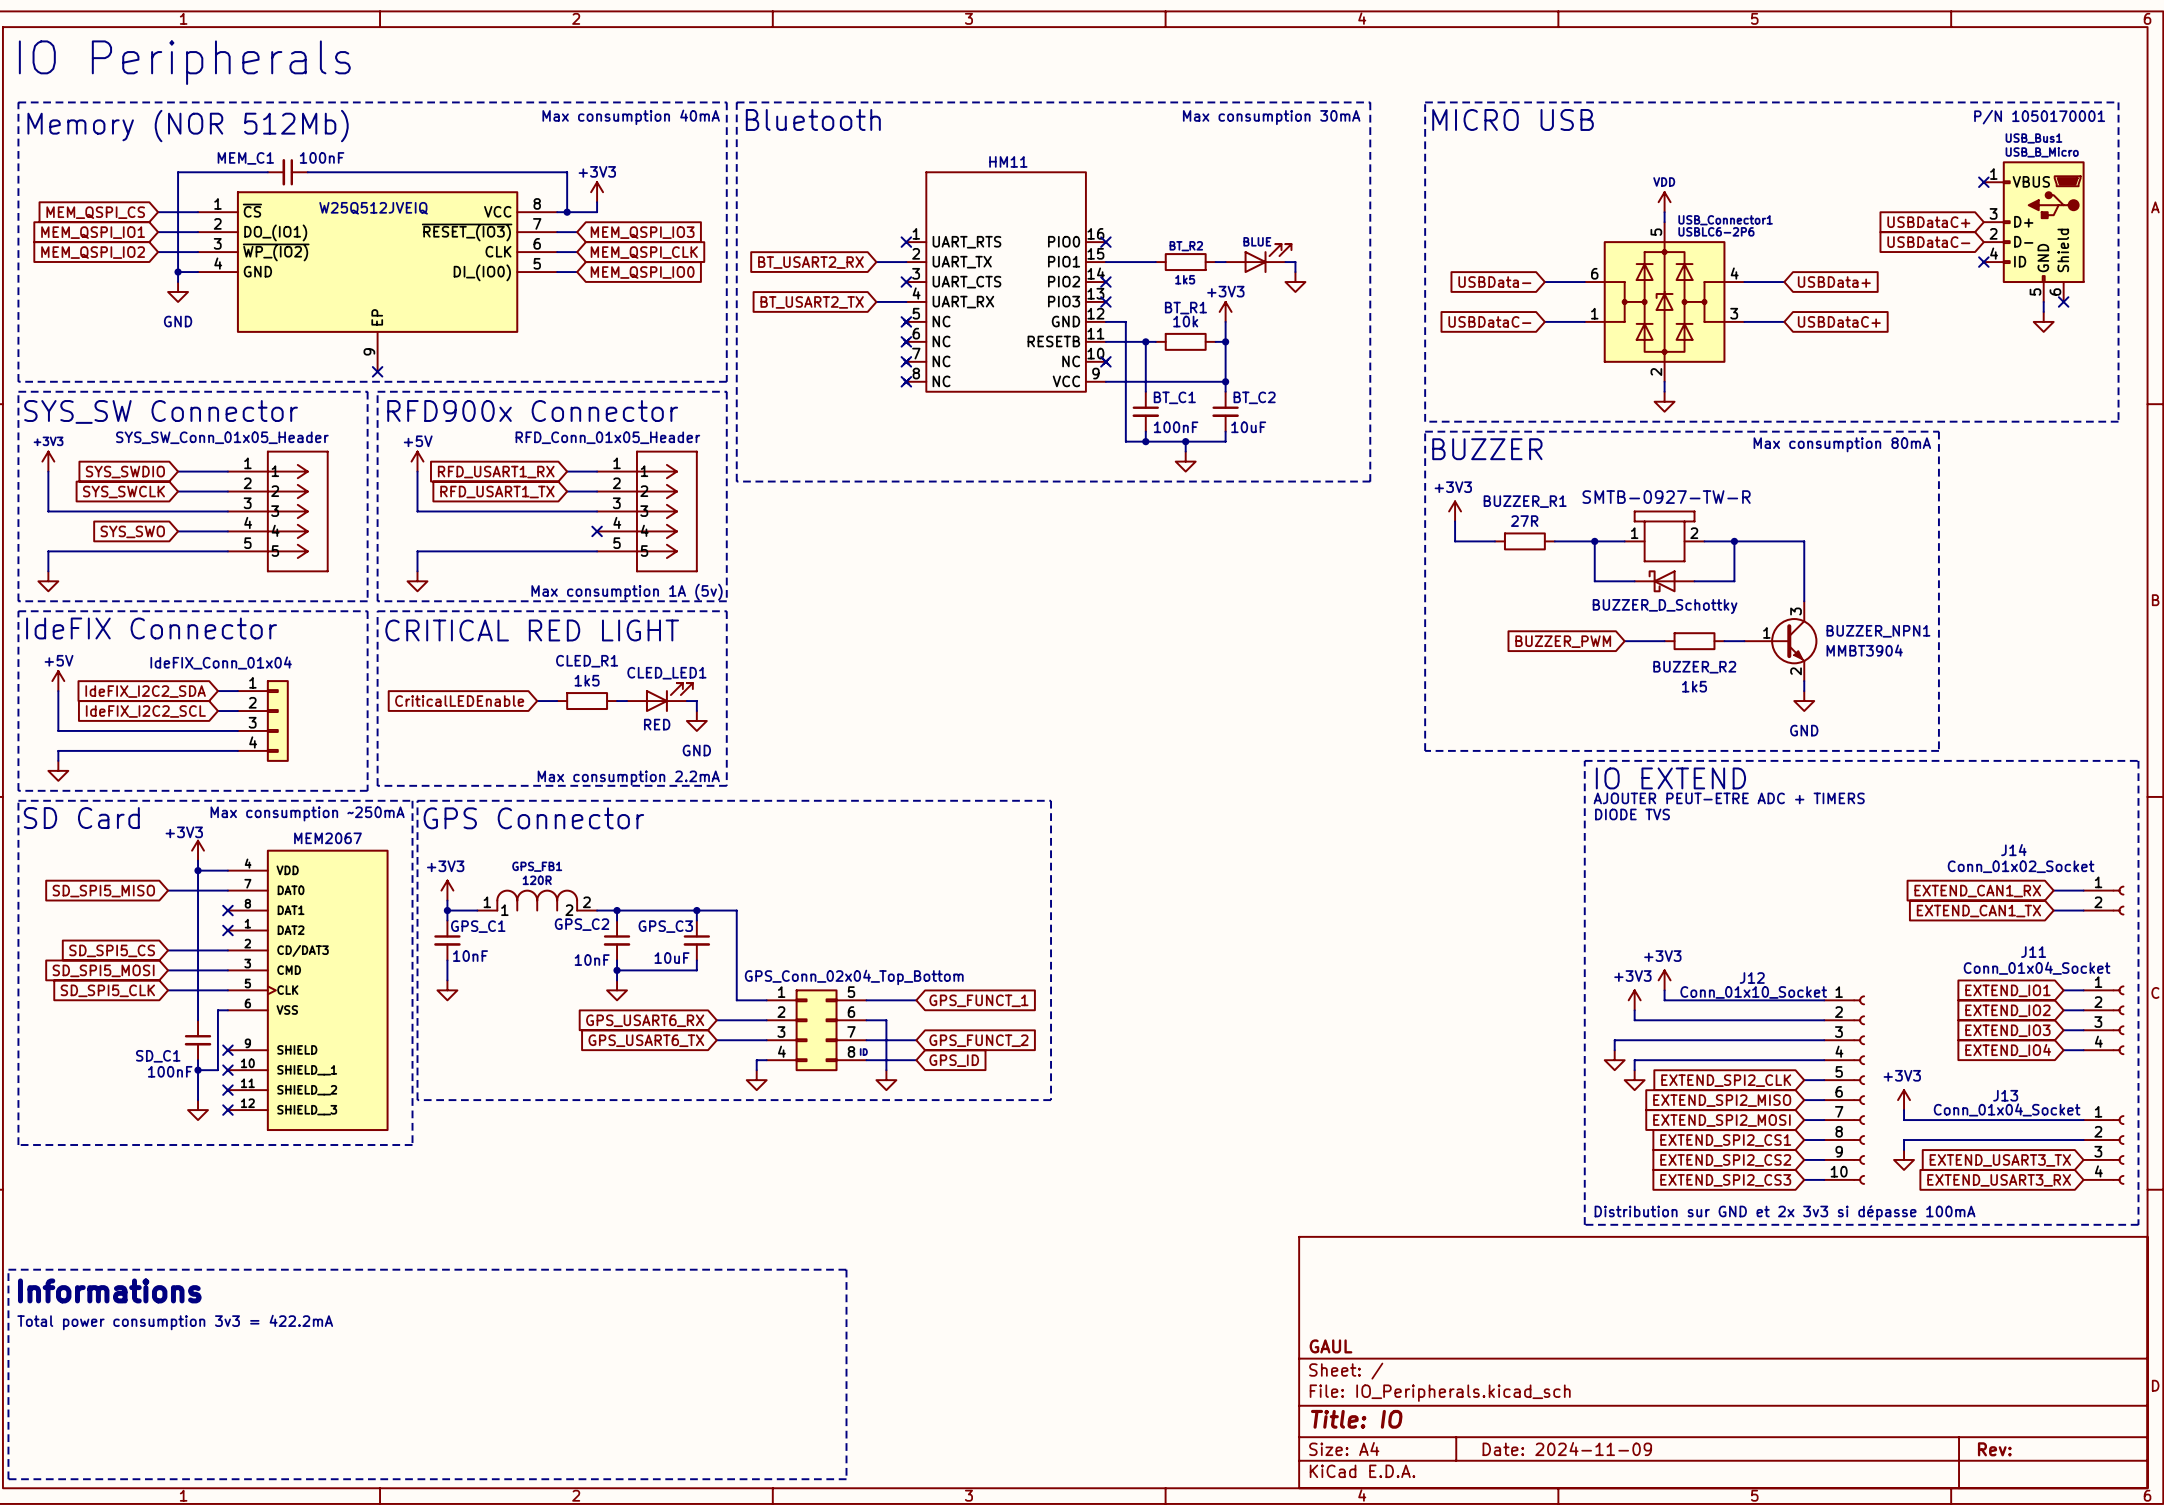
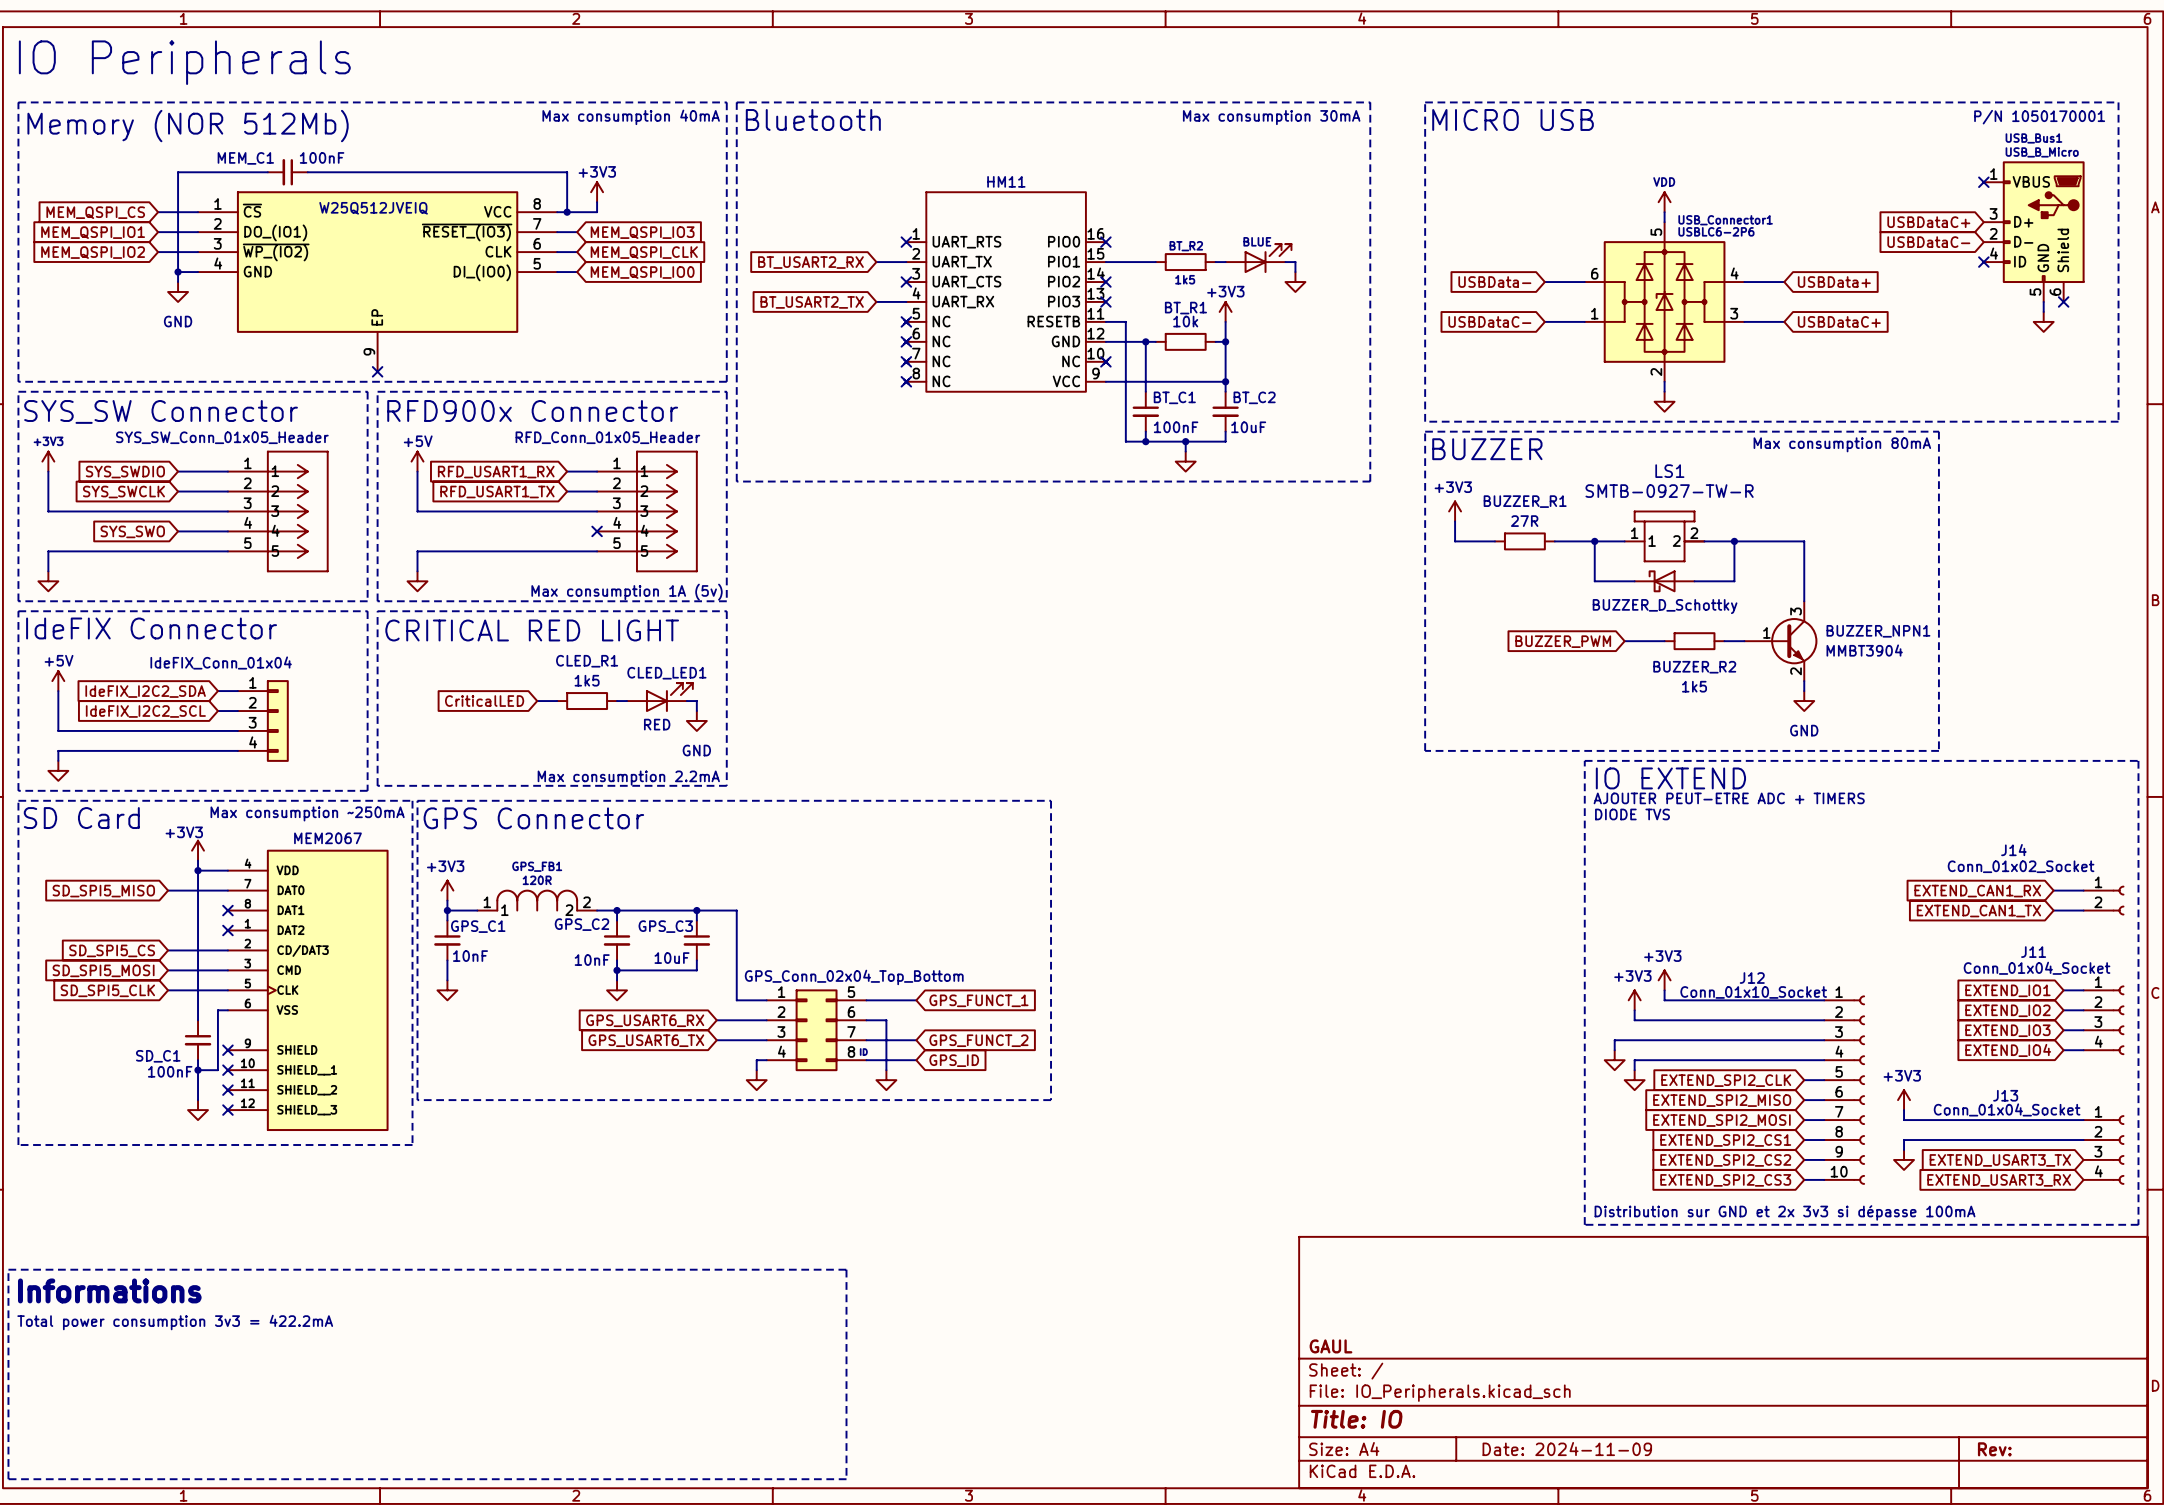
part: HM11 (1006, 282) -> none
part: none -> HM11 (1006, 291)
part: SMTB-0927-TW-R (1664, 536) -> none
LS1: none -> SMTB-0927-TW-R (1664, 536)
global label: CriticalLEDEnable (459, 701) -> CriticalLED (484, 701)

